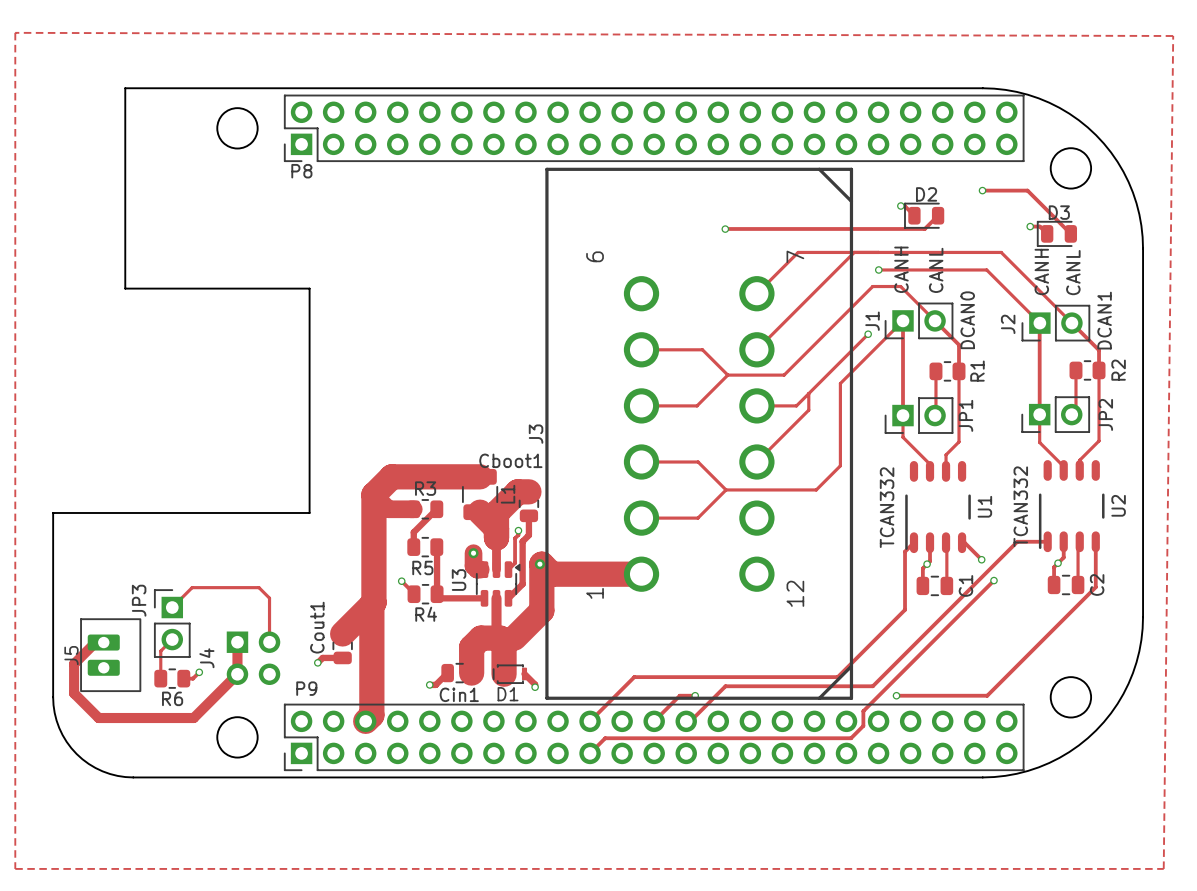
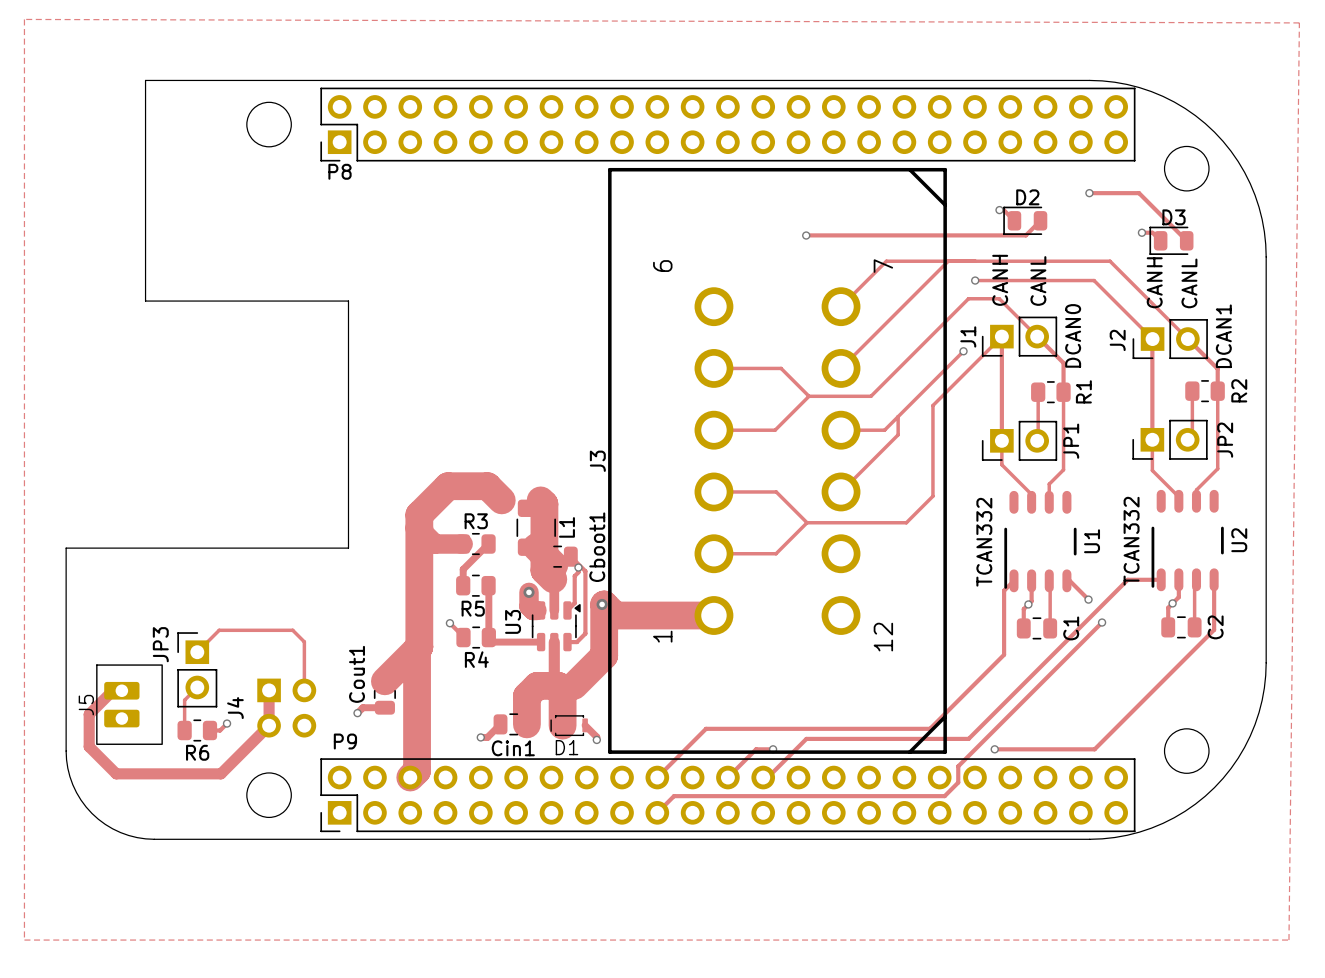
track: (480, 476) (391, 476) (373, 494) -> (501, 500) (487, 486) (448, 486) (419, 514) (419, 528)
track: (528, 491) (517, 491) (496, 513) (496, 542) -> (540, 500) (544, 504) (544, 570) (554, 580)
Cboot1 rotation: 0° (528, 503) -> 90° clockwise (557, 556)
Cboot1 position: (528, 503) -> (557, 556)
track: (528, 515) (528, 535) (522, 541) (522, 584) (508, 598) -> (570, 556) (585, 571) (585, 633) (576, 642) (567, 642)

